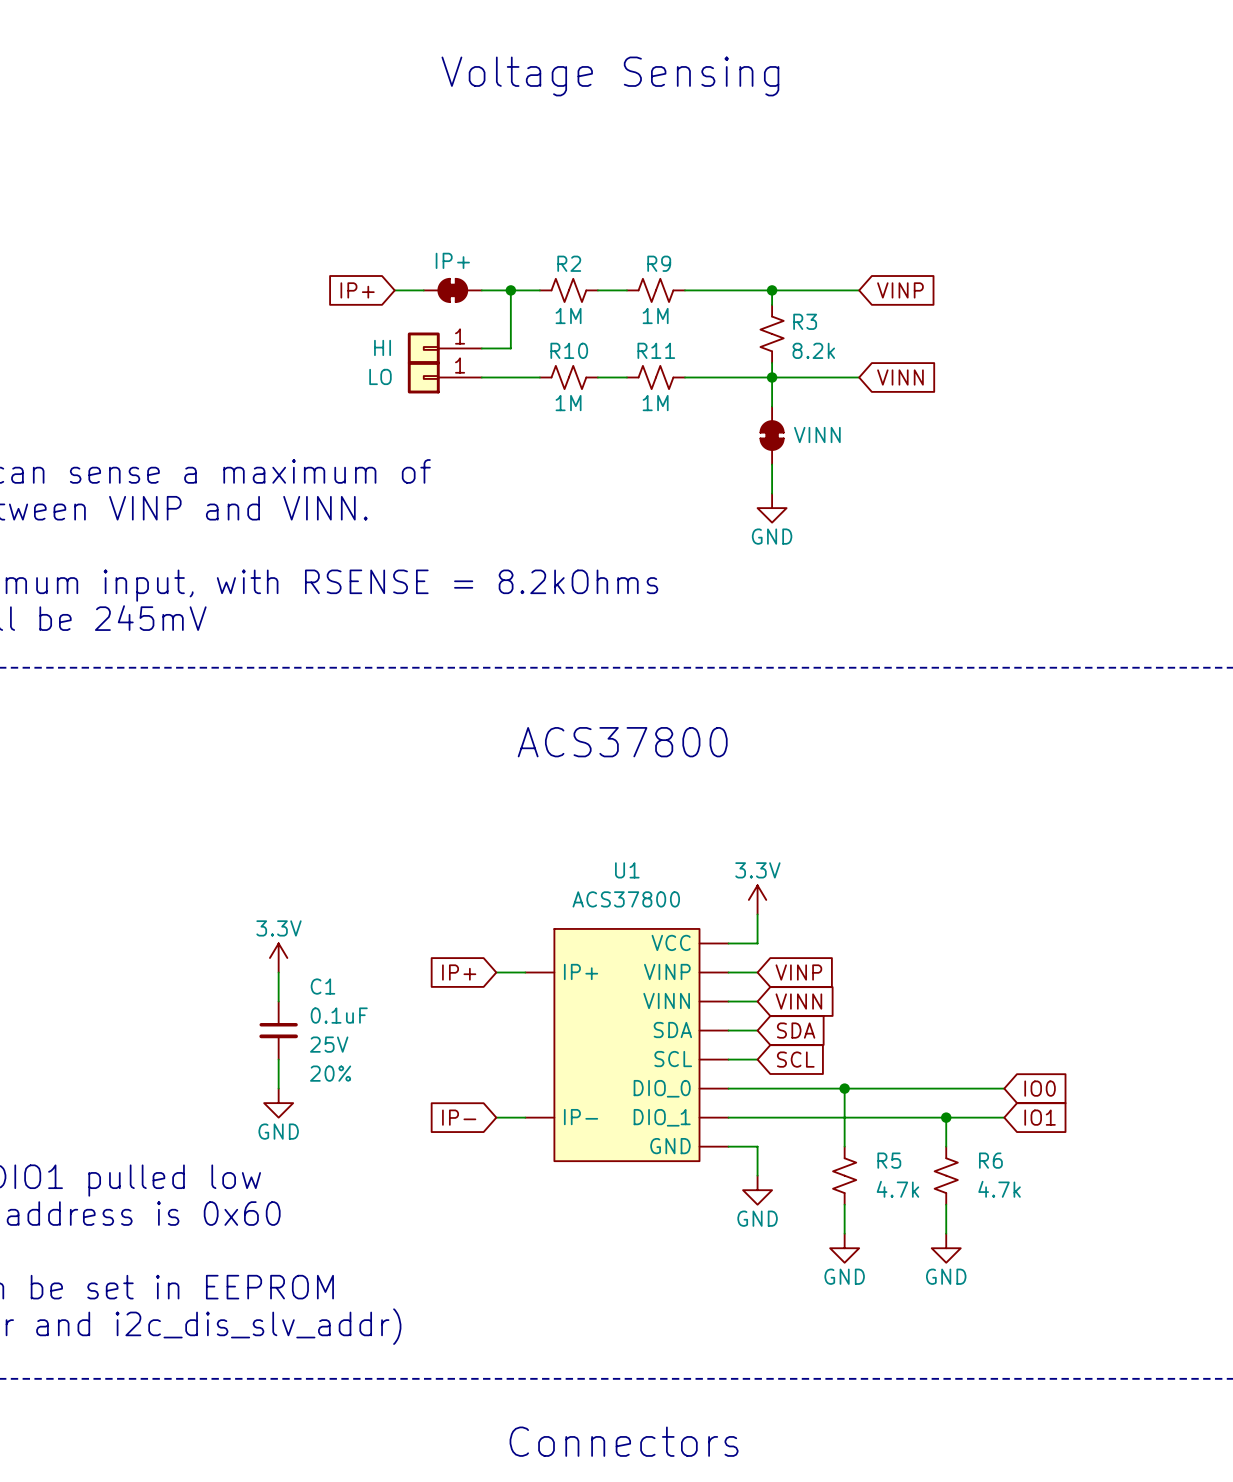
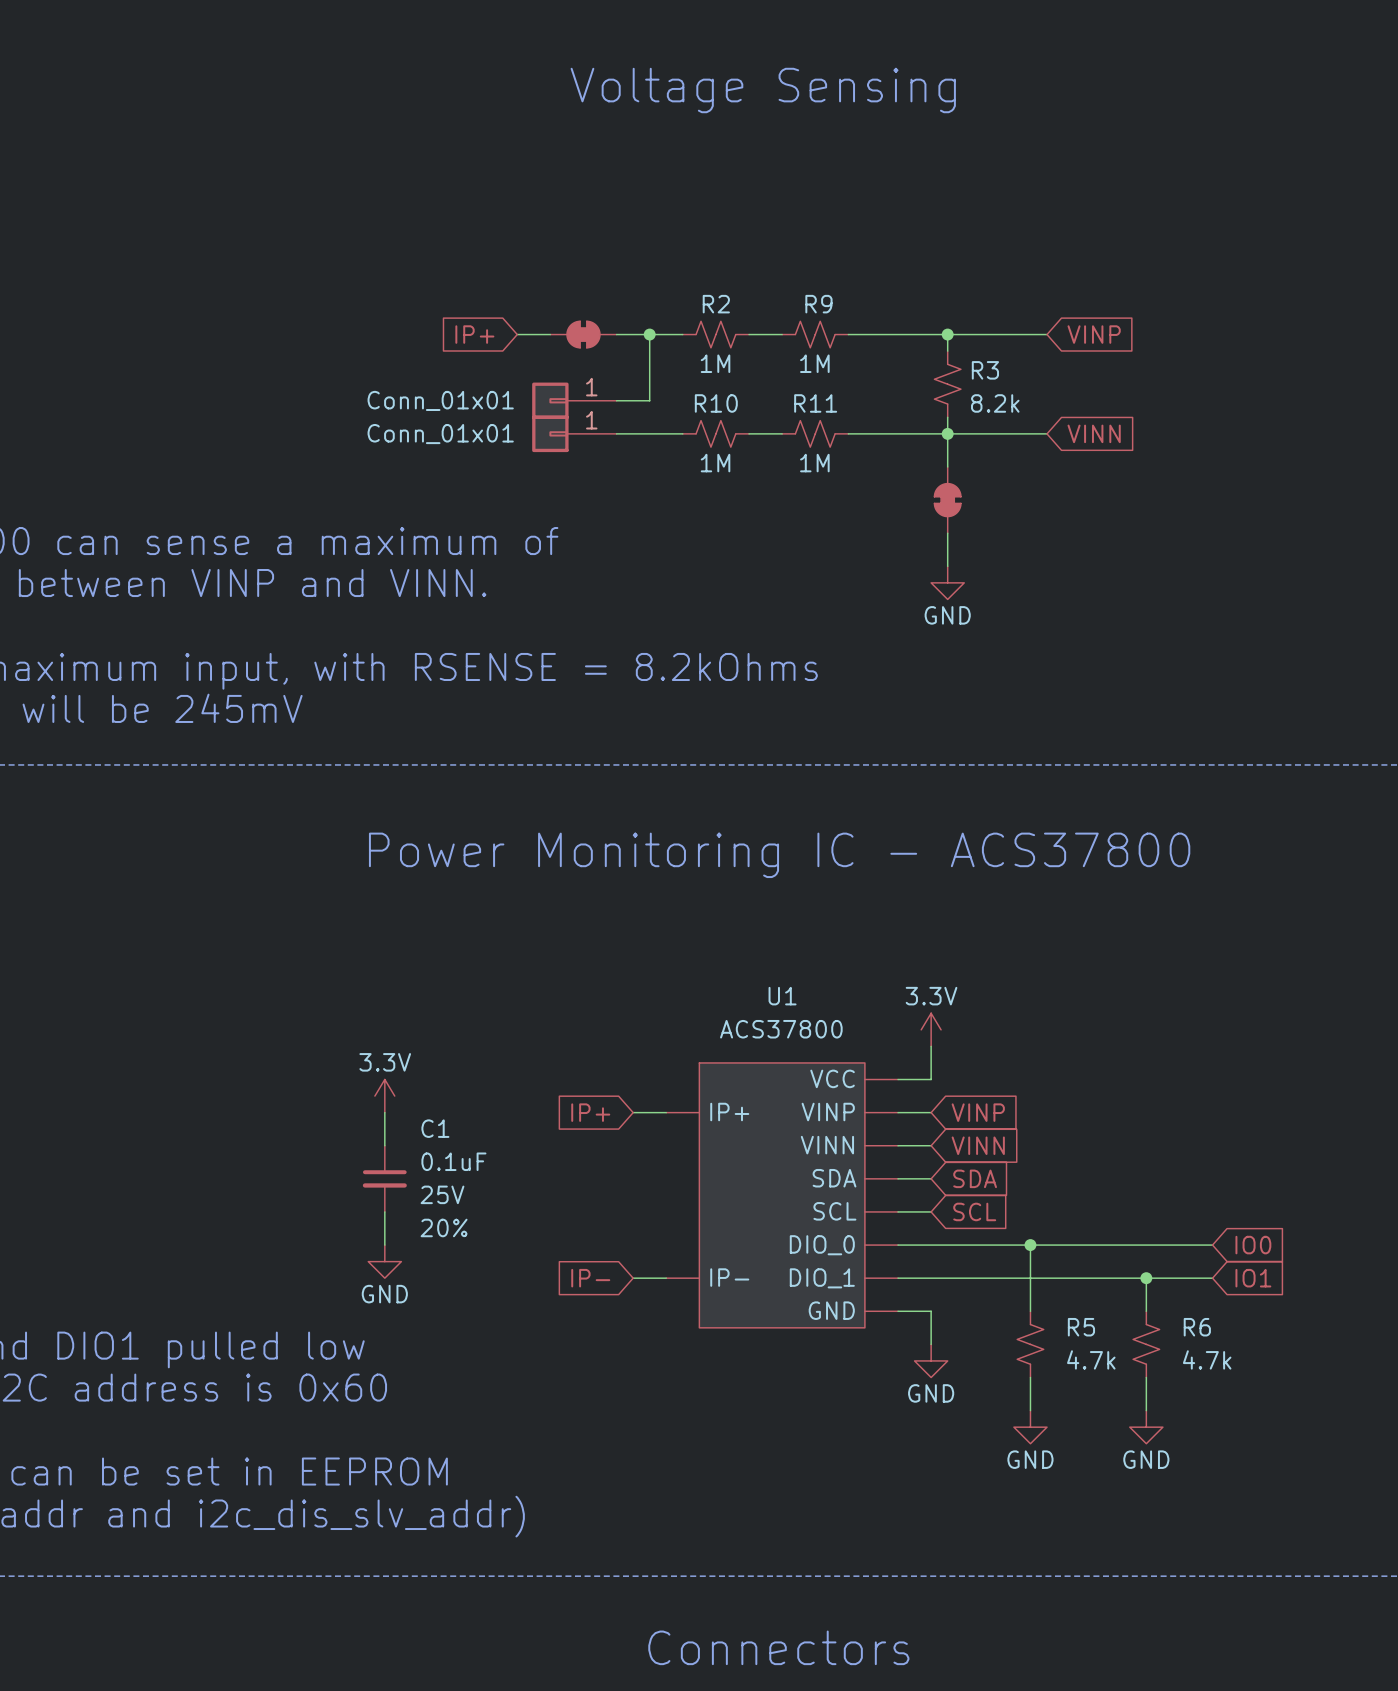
part value: IP+ (452, 260) -> none
part value: HI (382, 347) -> Conn_01x01 (440, 400)
part value: LO (380, 376) -> Conn_01x01 (440, 434)
part value: VINN (817, 435) -> none
text: ACS37800 (622, 742) -> Power Monitoring IC - ACS37800 (779, 855)

